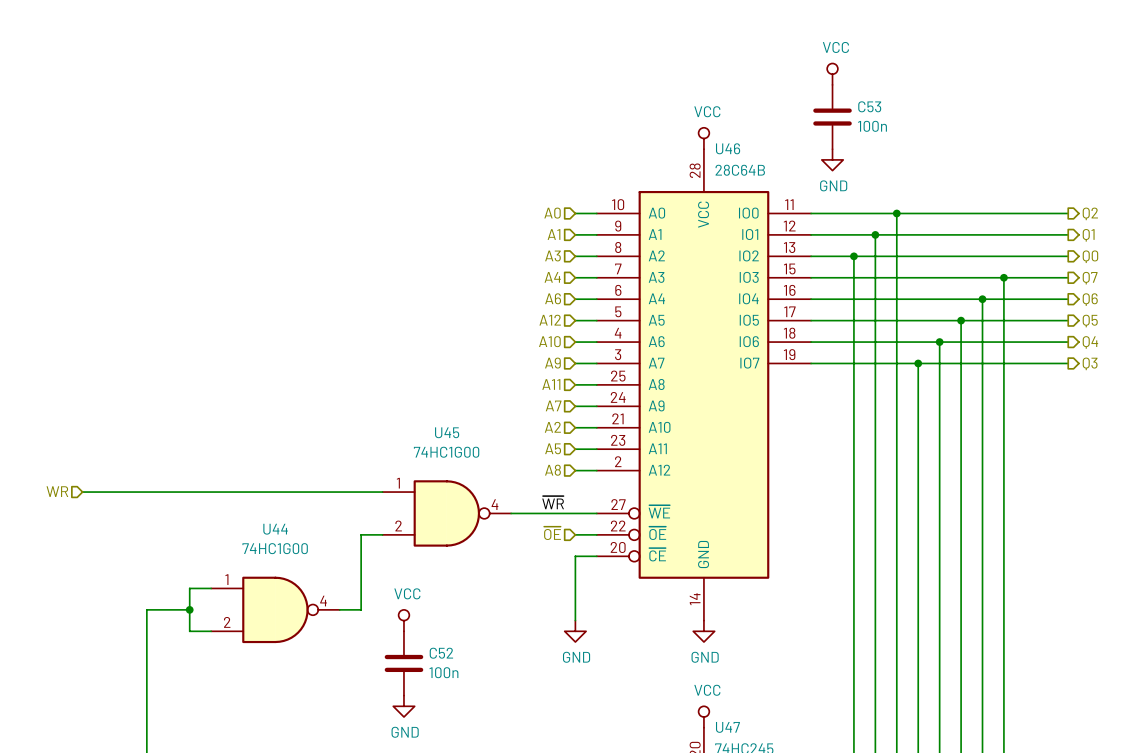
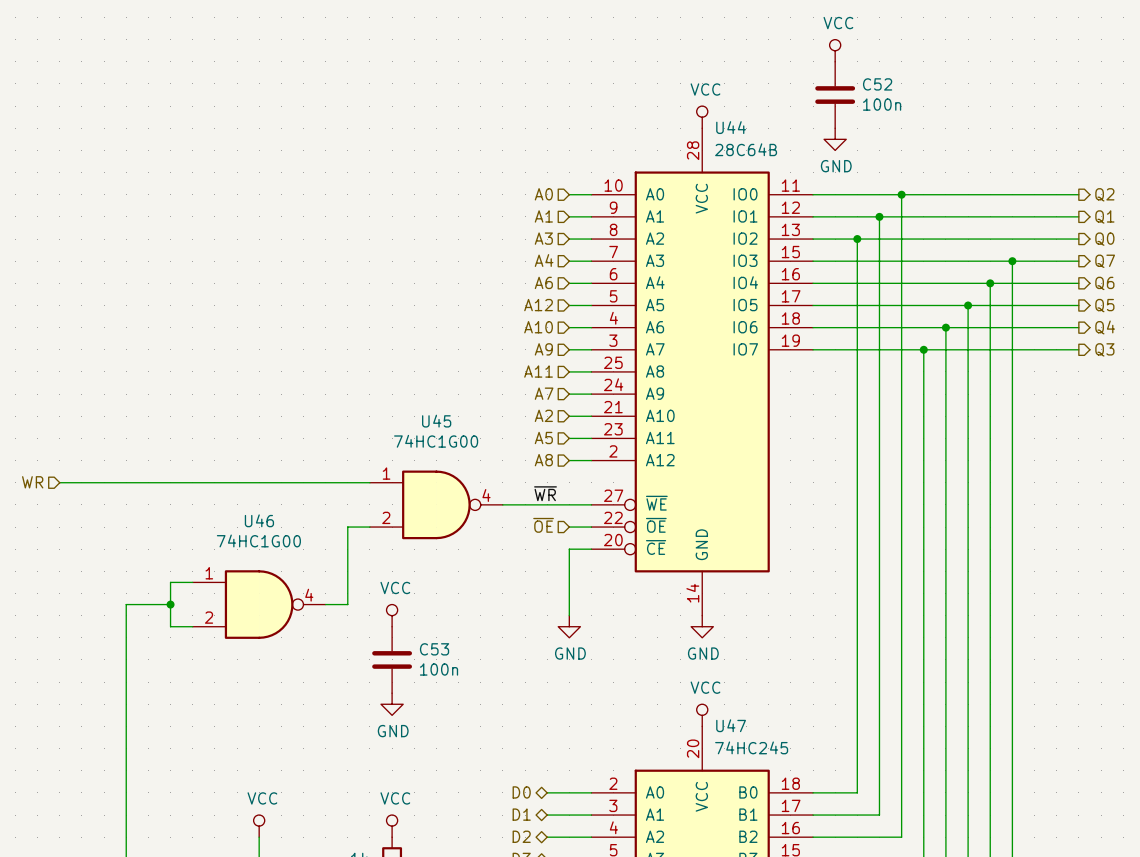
C53 name: C53 (869, 106) -> C52 (877, 84)
U46 name: U46 (728, 148) -> U44 (731, 127)
U44 name: U44 (275, 529) -> U46 (259, 520)
C52 name: C52 (441, 653) -> C53 (434, 649)

